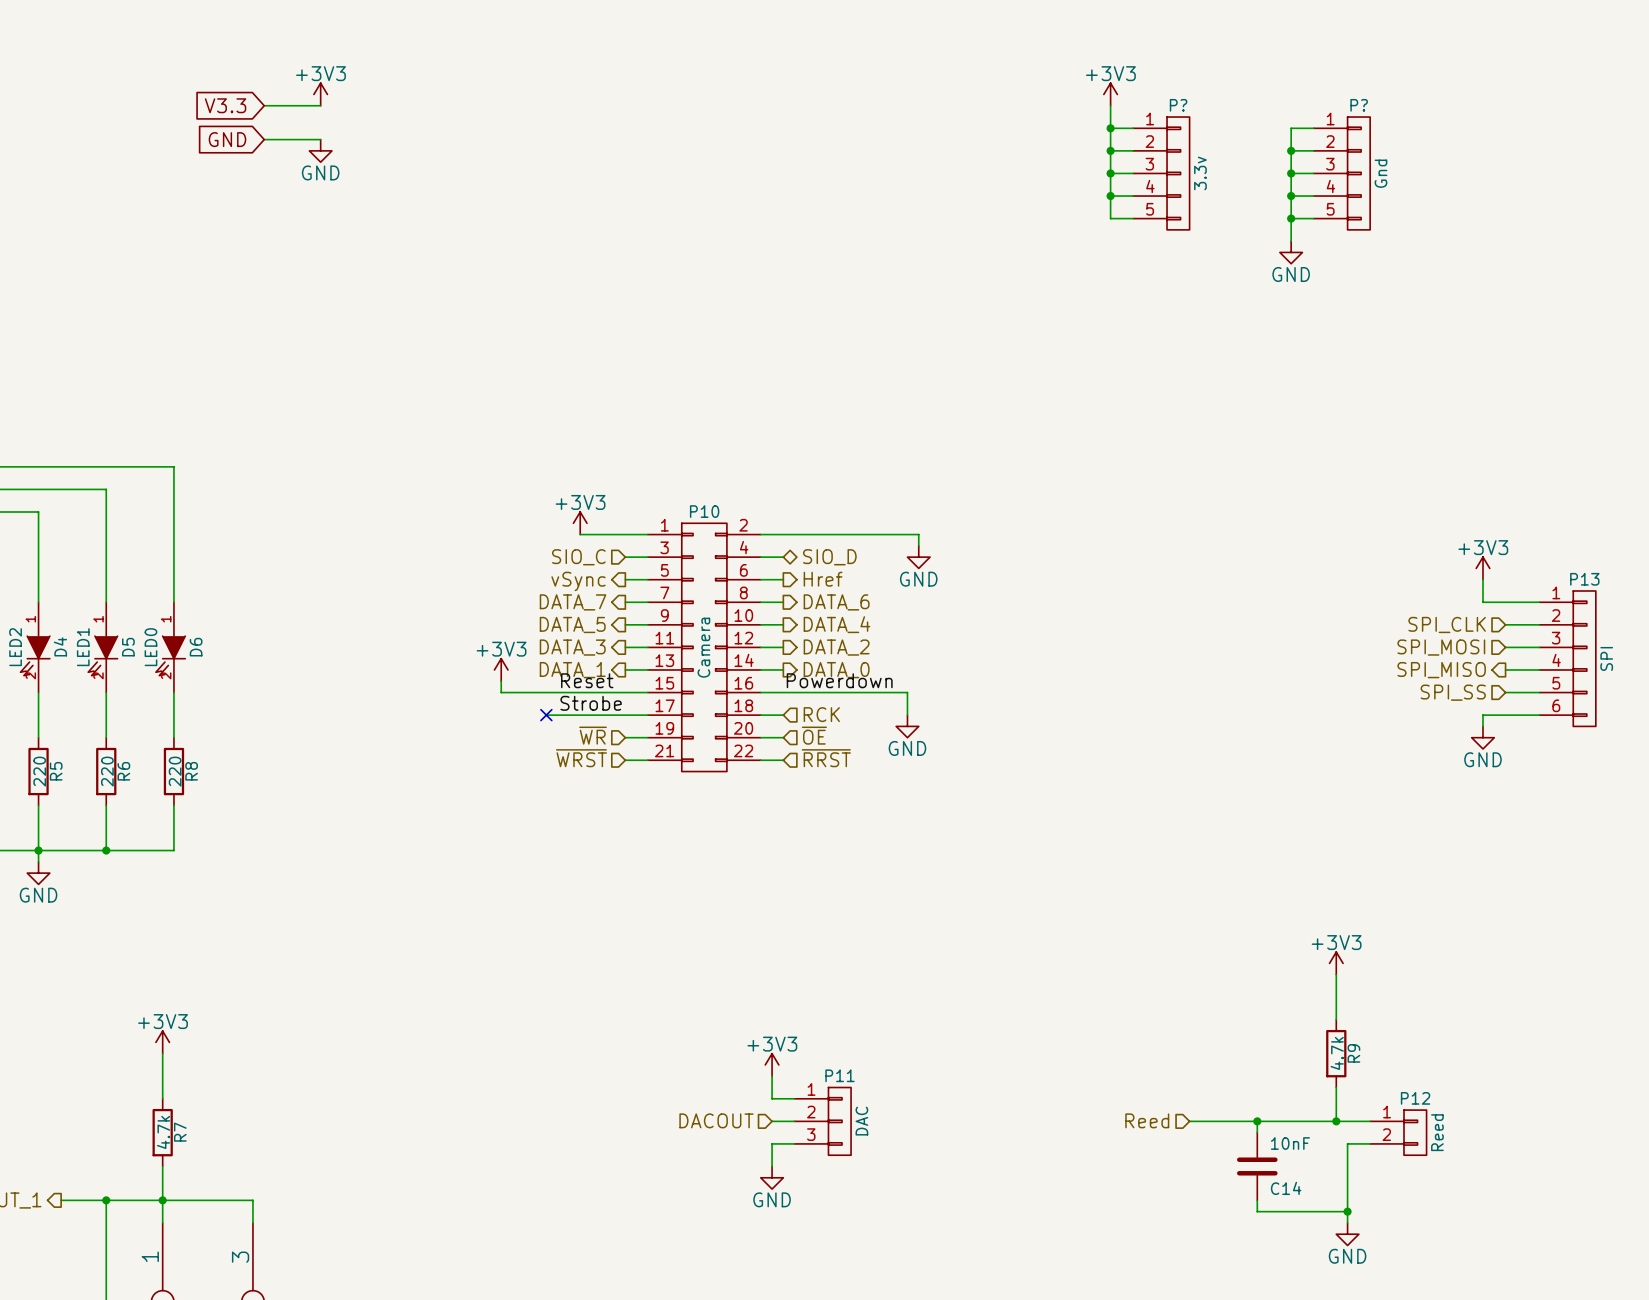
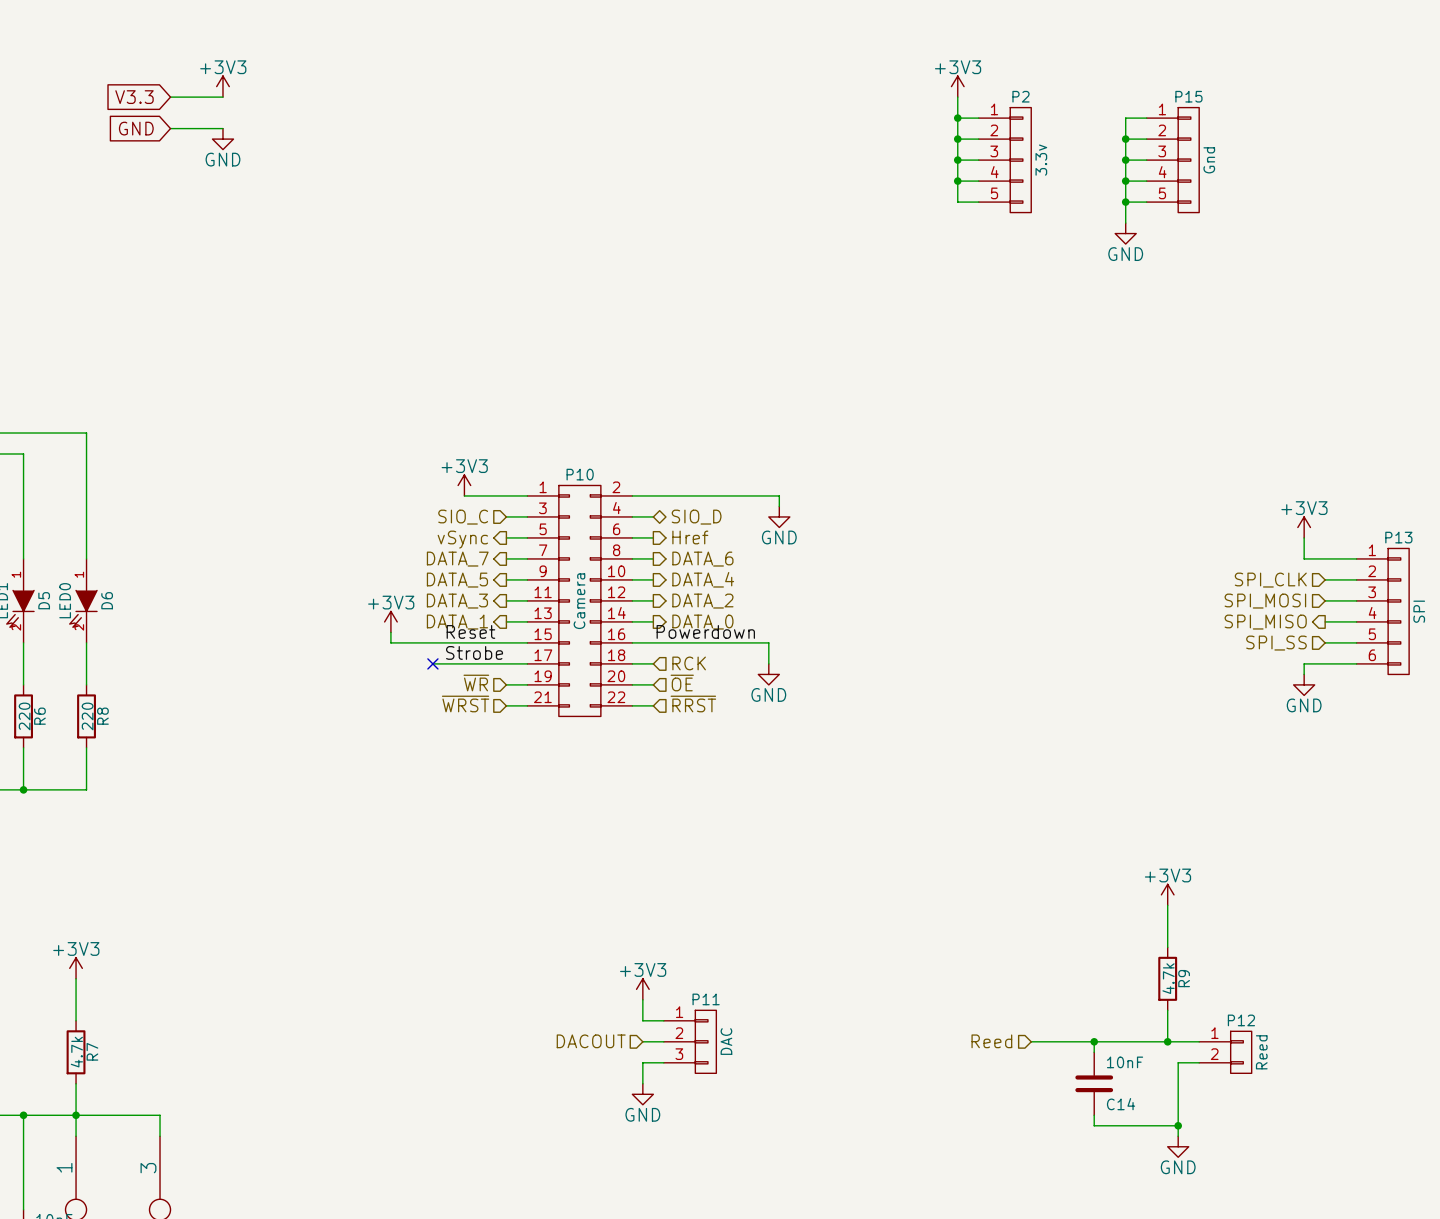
P? name: P? (1178, 105) -> P2 (1020, 96)
P? name: P? (1359, 105) -> P15 (1188, 96)

